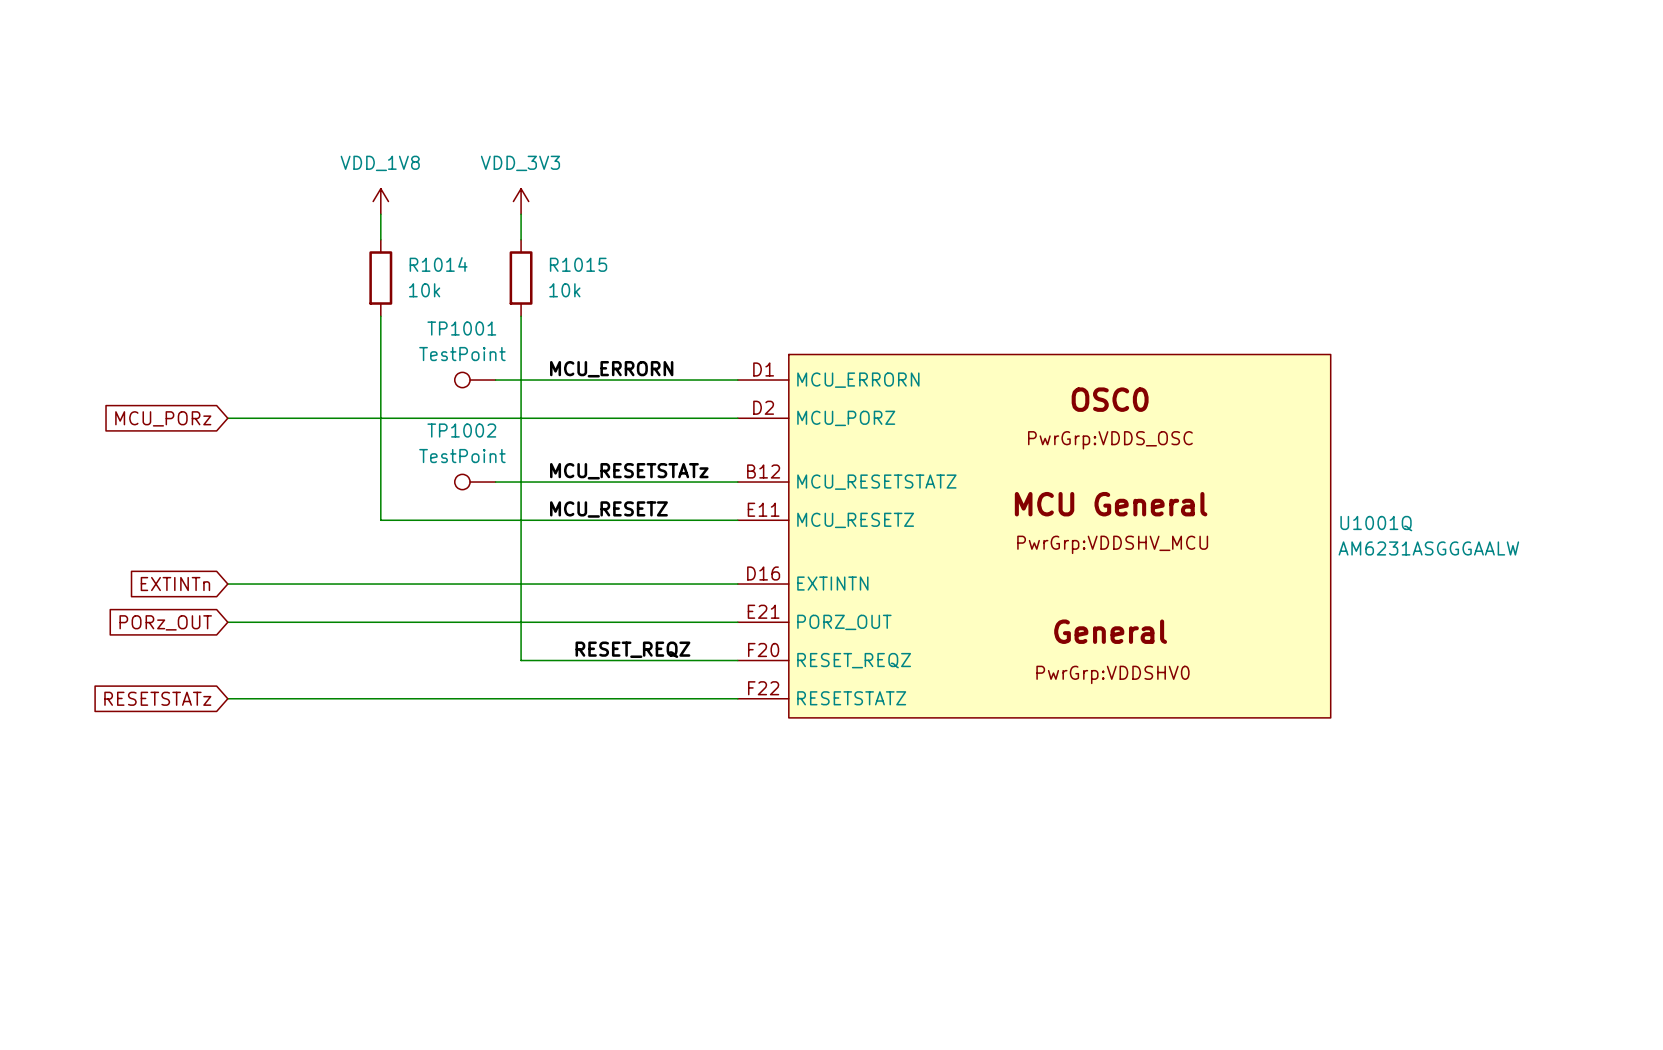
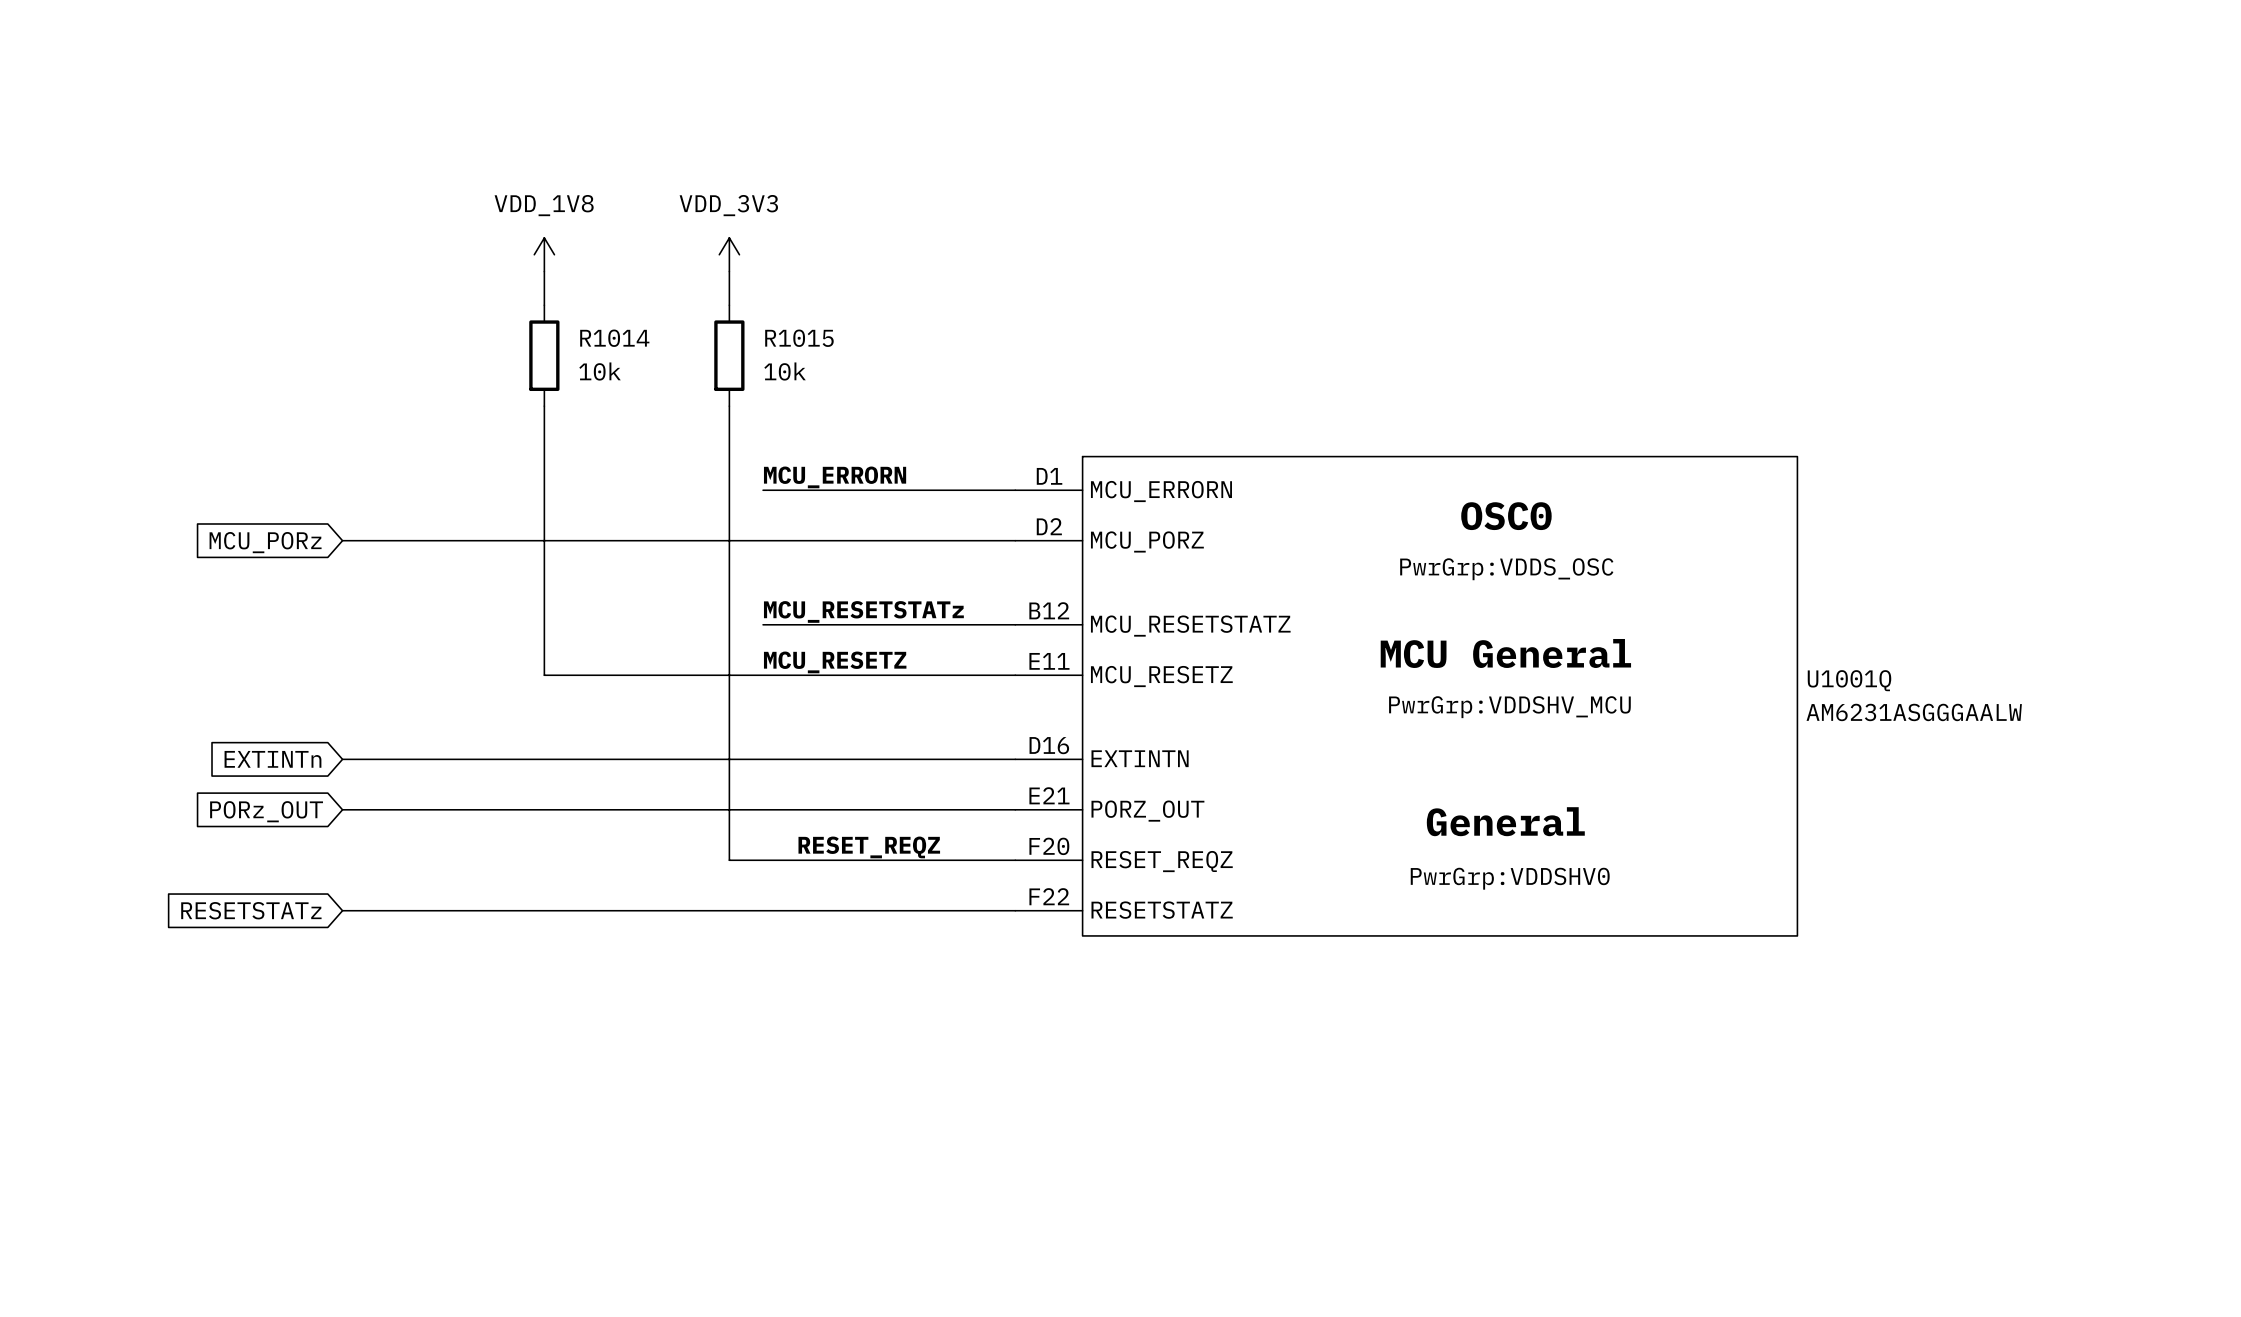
TP1001: TestPoint (475, 380) -> none
wire: (495, 380) (546, 380) -> none
TP1002: TestPoint (475, 482) -> none
wire: (495, 482) (546, 482) -> none

